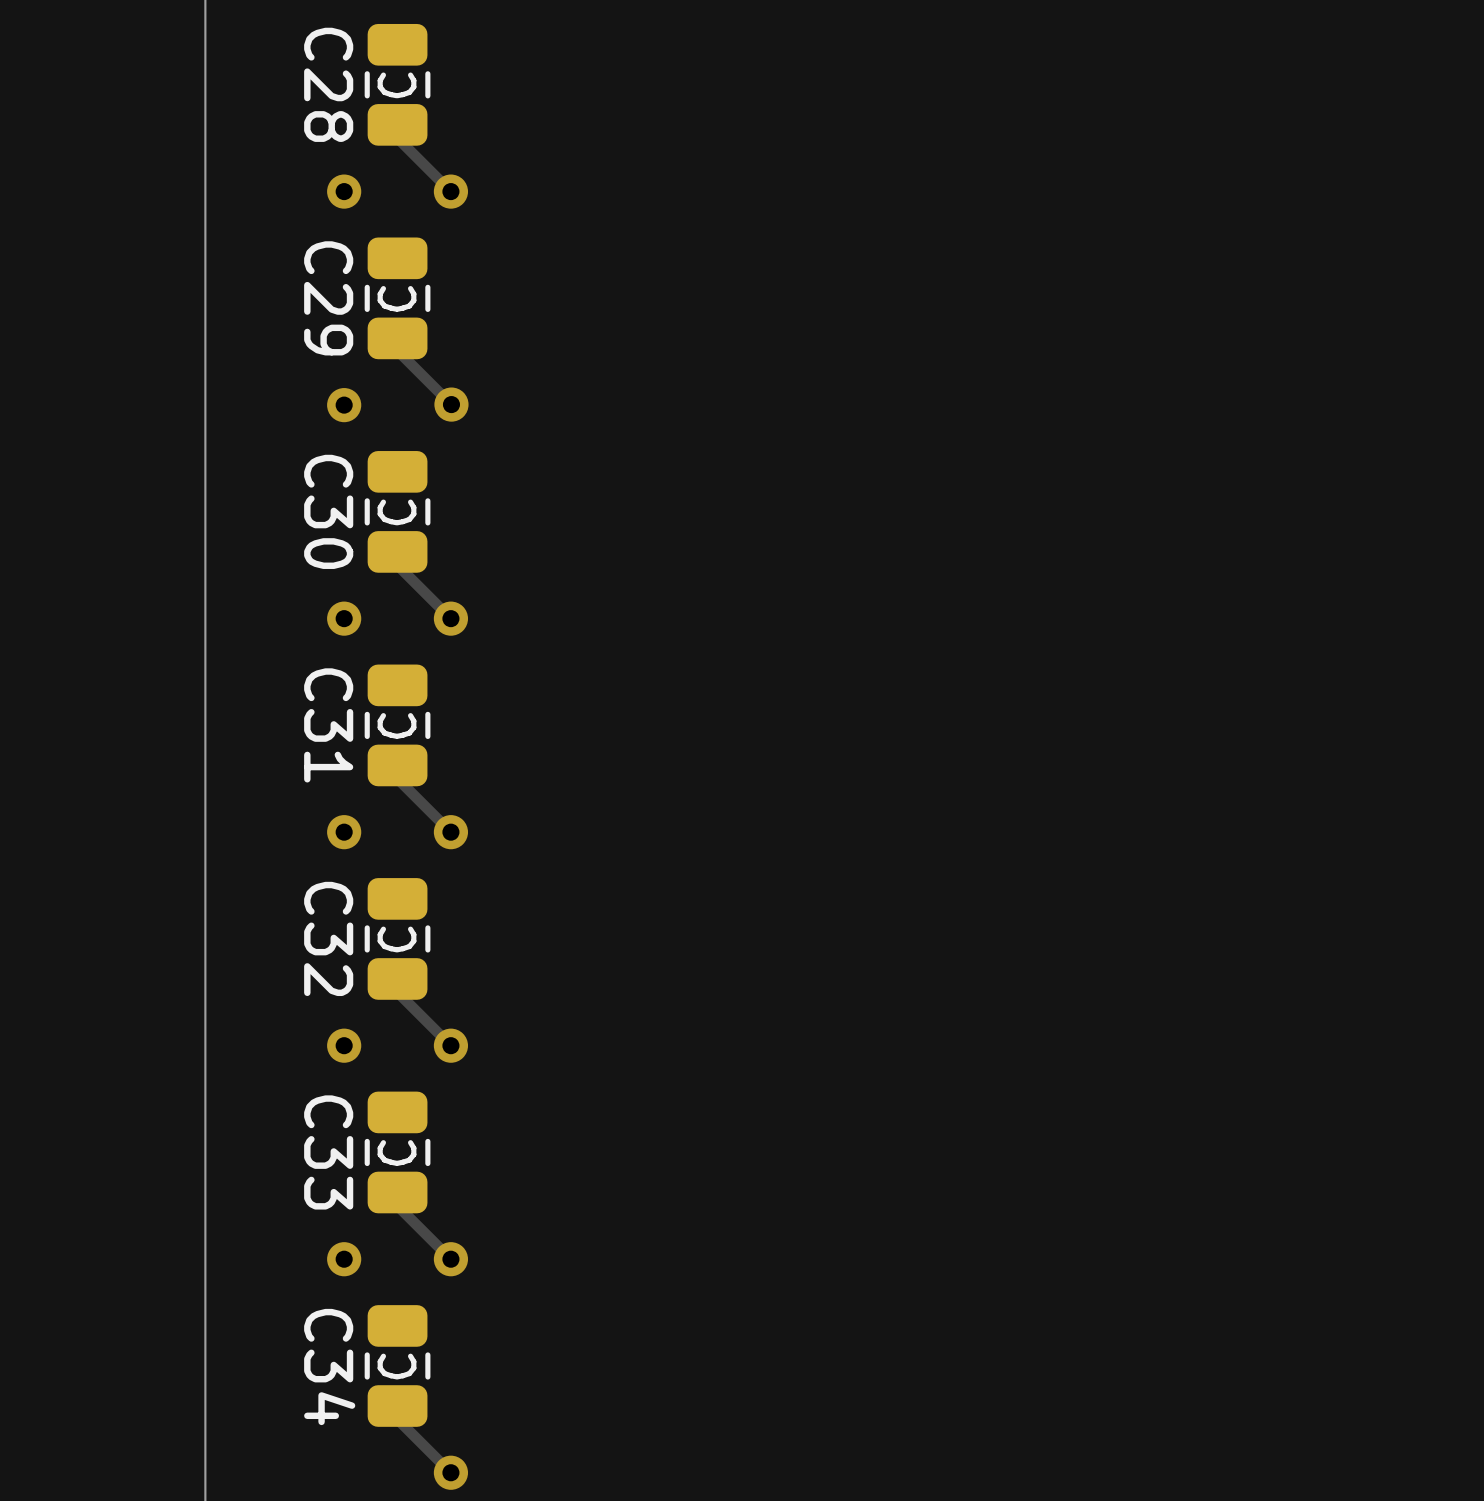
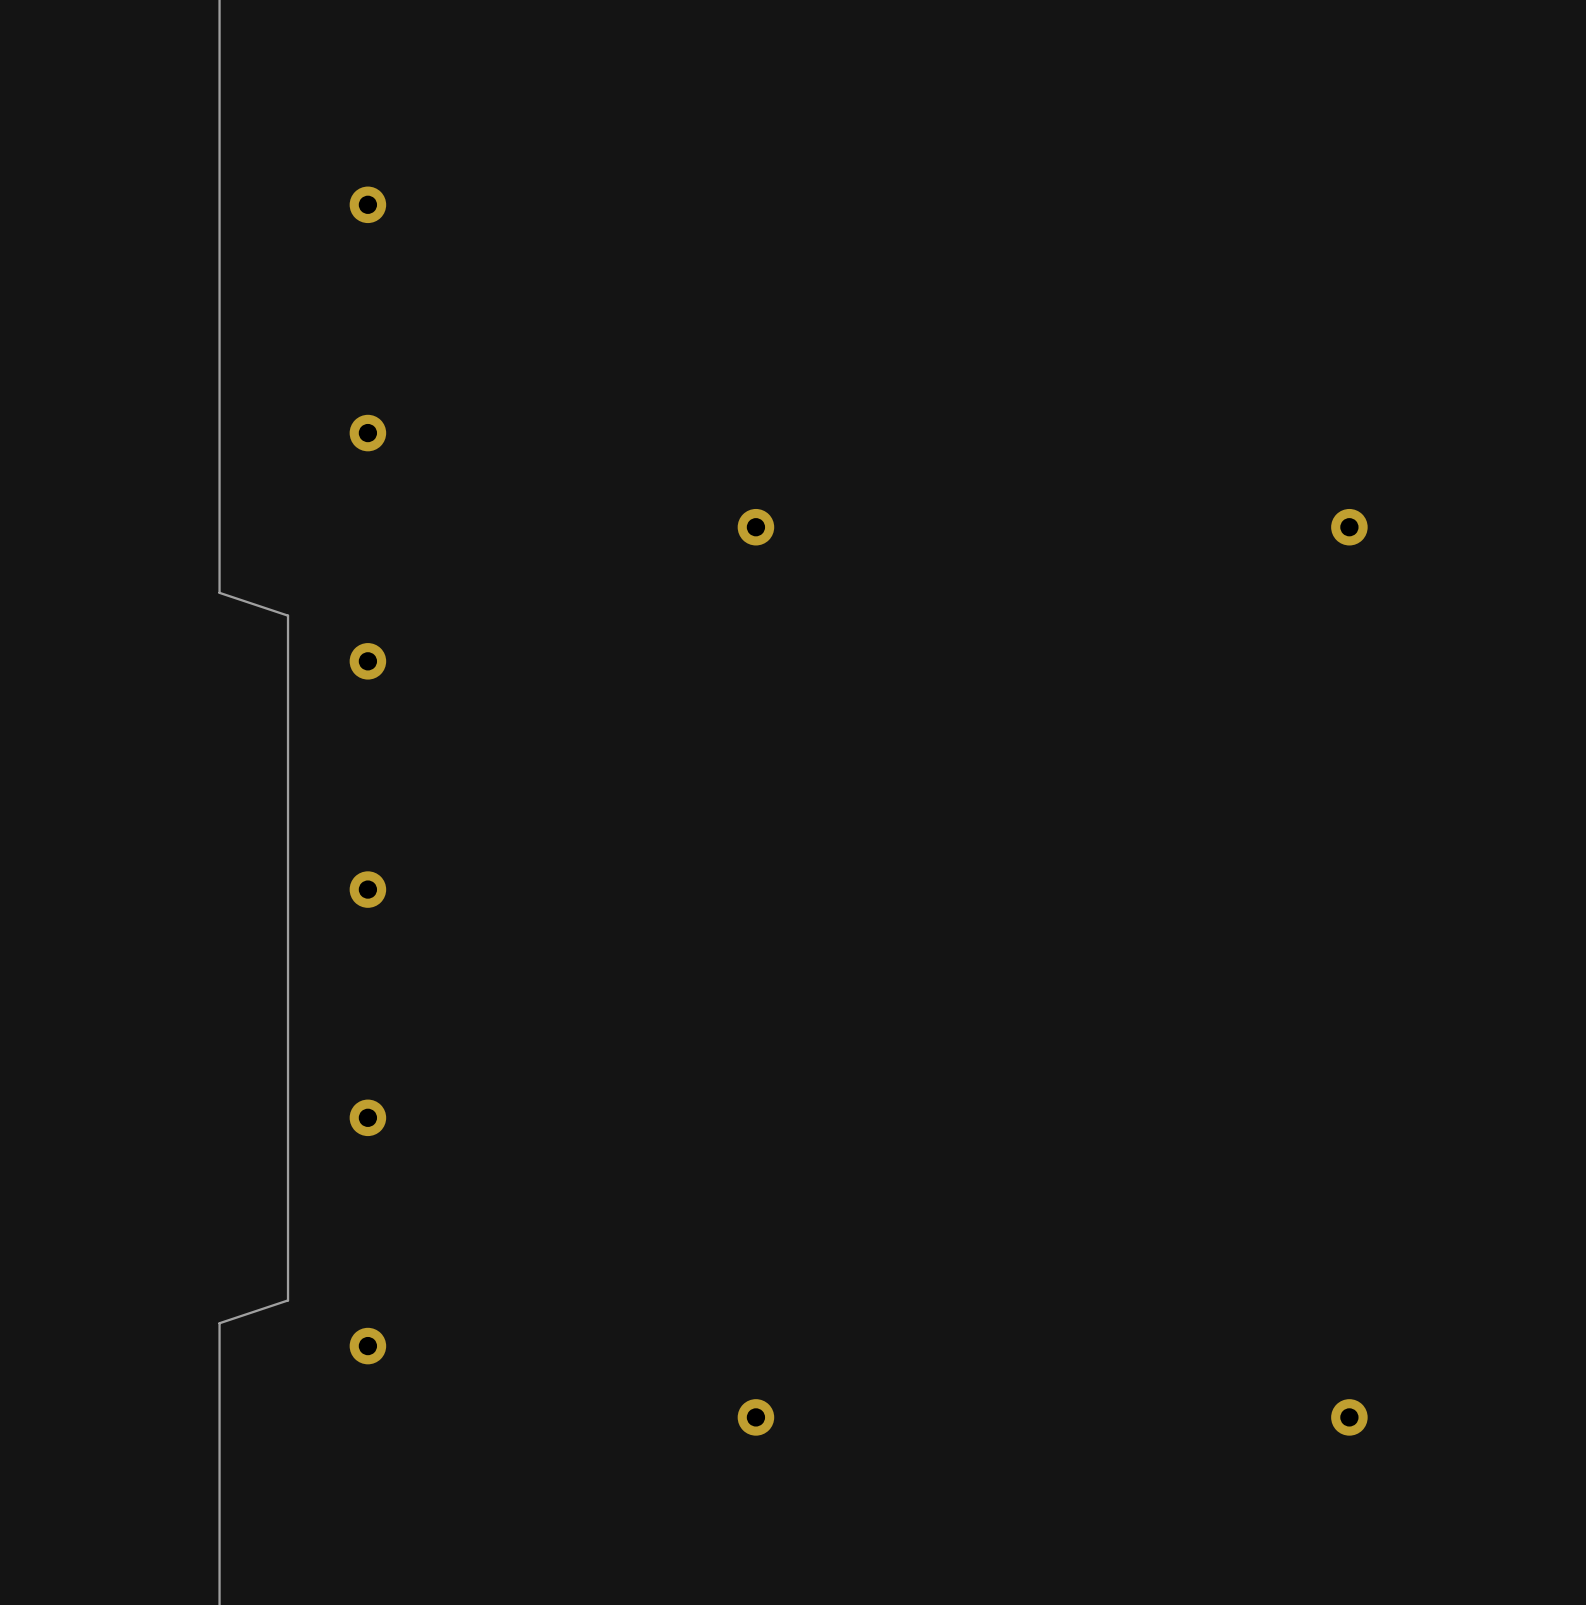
C28: (397, 84) -> none
track: (397, 124) (397, 138) (450, 191) -> none
via: (450, 191) -> none
C29: (397, 298) -> none
track: (397, 338) (397, 350) (451, 404) -> none
via: (451, 404) -> none
via: none -> (755, 527)
via: none -> (1349, 527)
C30: (397, 511) -> none
track: (397, 551) (397, 565) (450, 618) -> none
board edge: (205, 554) (205, 1237) -> (219, 592) (288, 615) (288, 1300) (219, 1323)
via: (450, 618) -> none
C31: (397, 725) -> none
track: (397, 765) (397, 778) (450, 832) -> none
via: (450, 832) -> none
C32: (397, 938) -> none
track: (397, 978) (397, 992) (450, 1045) -> none
via: (450, 1045) -> none
C33: (397, 1152) -> none
track: (397, 1192) (397, 1205) (450, 1259) -> none
via: (450, 1259) -> none
via: none -> (755, 1417)
via: none -> (1349, 1417)
C34: (397, 1365) -> none
track: (397, 1406) (397, 1419) (450, 1472) -> none
via: (450, 1472) -> none

